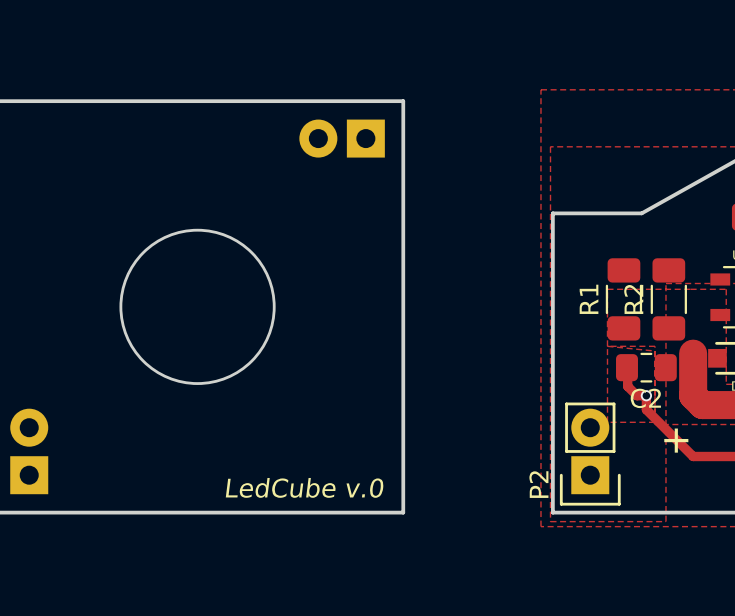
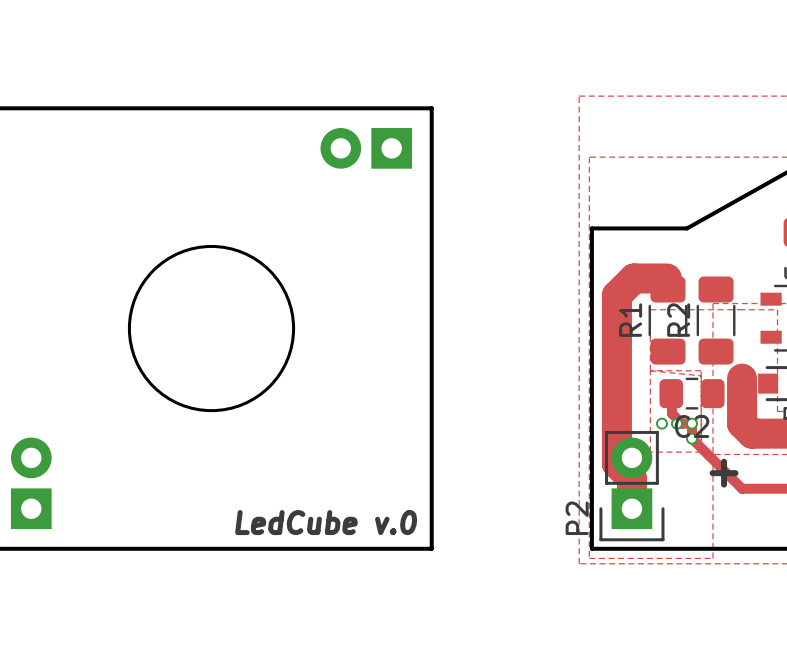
track: none -> (666, 278) (633, 278) (616, 295) (616, 463) (631, 478) (631, 508)
via: none -> (661, 423)
via: none -> (677, 423)
via: none -> (692, 438)

